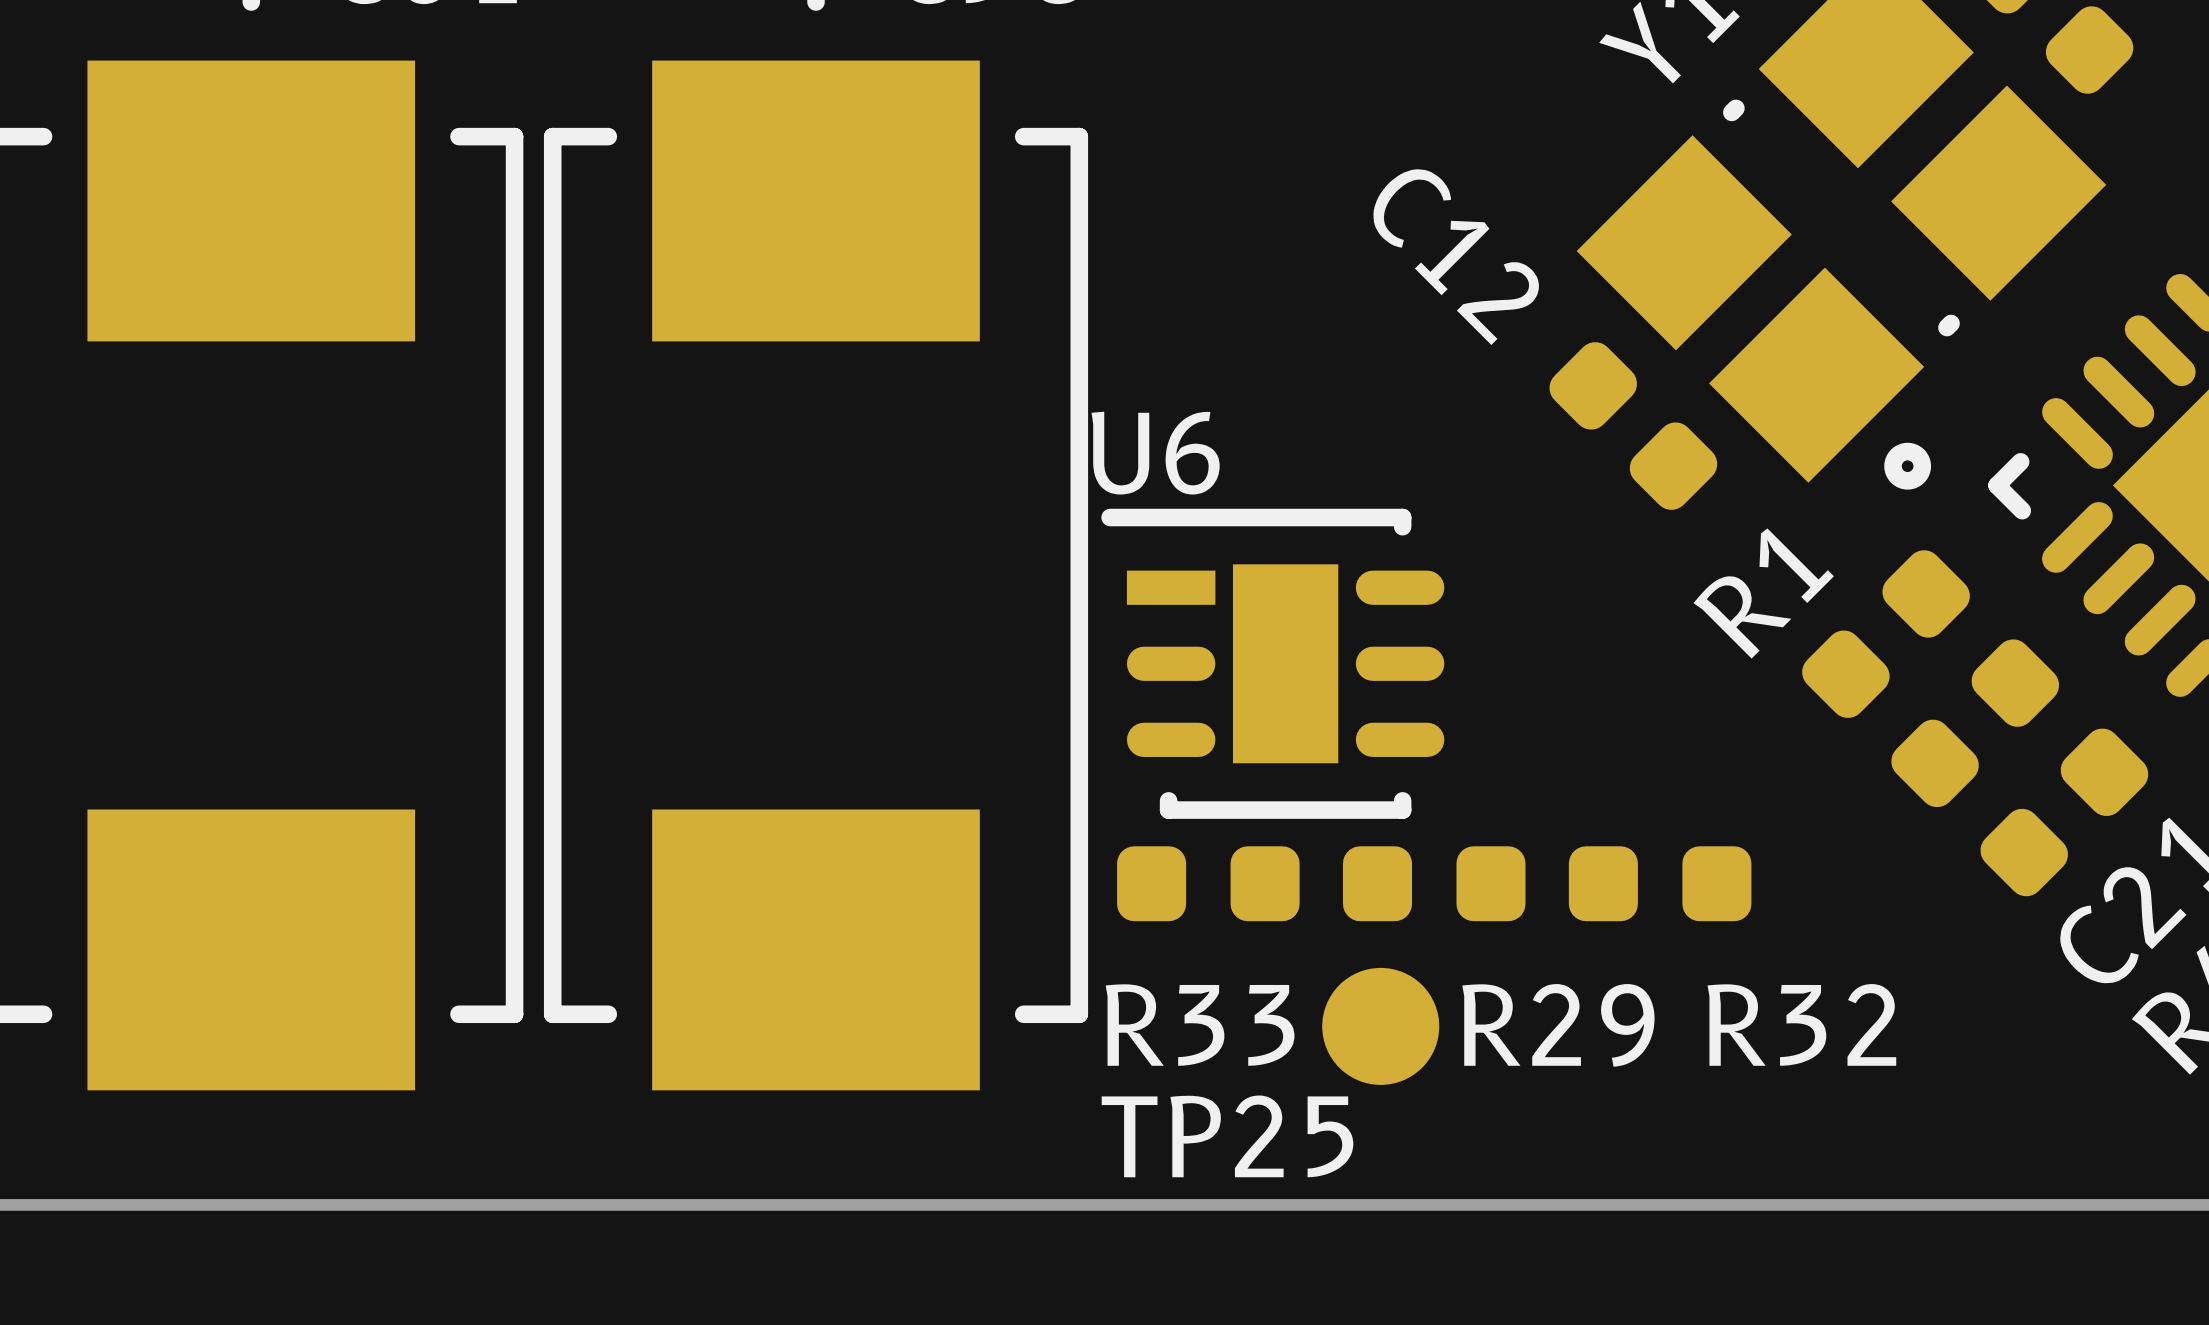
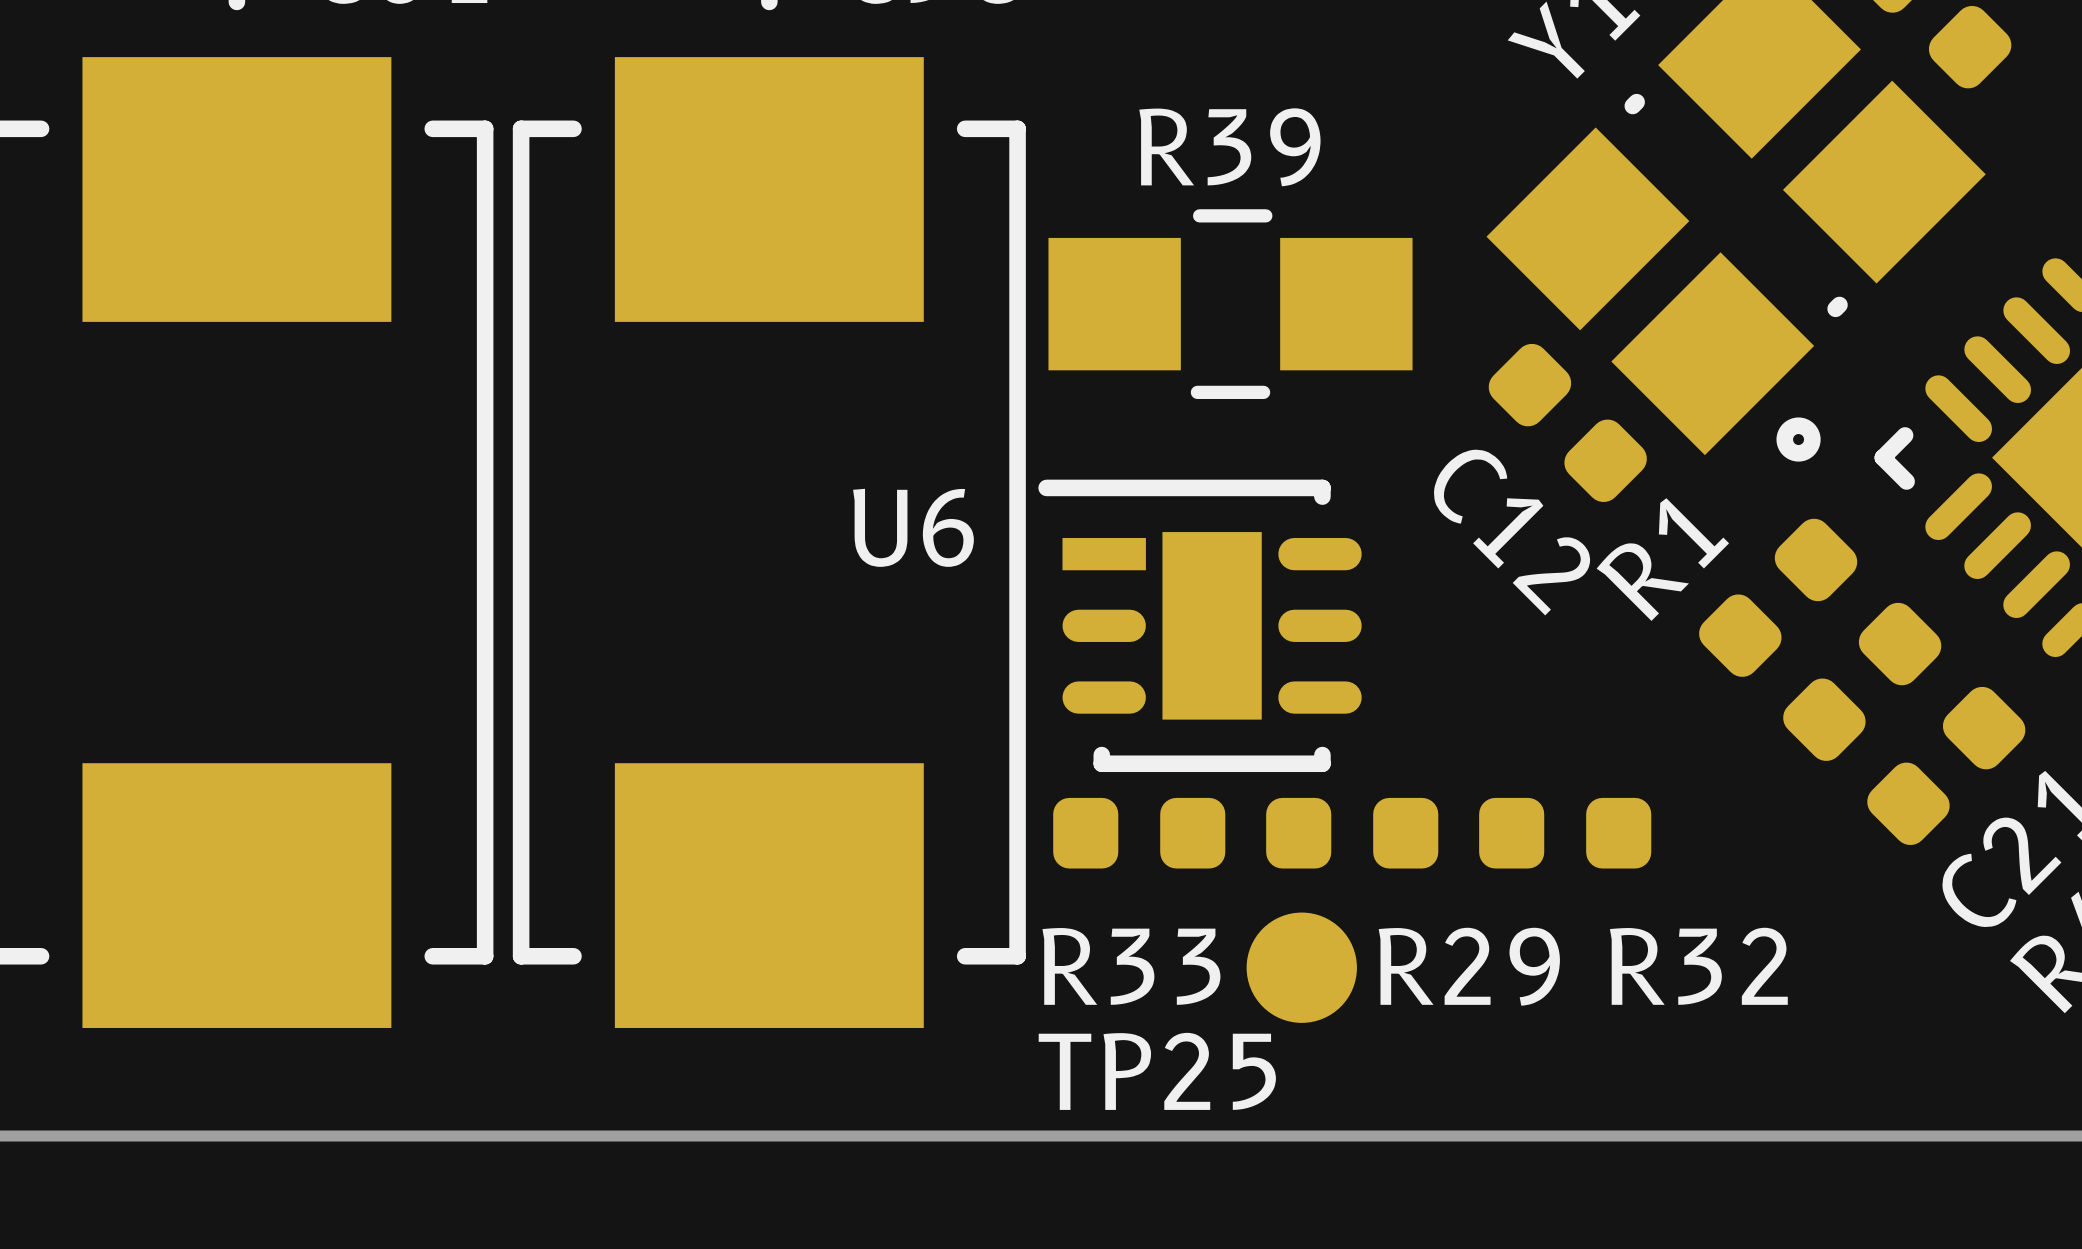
C12 name position: C12 (1455, 256) -> C12 (1511, 532)
R39: none -> (1230, 304)
C12 position: (1633, 426) -> (1567, 422)
U6 name position: U6 (1155, 453) -> U6 (913, 527)

